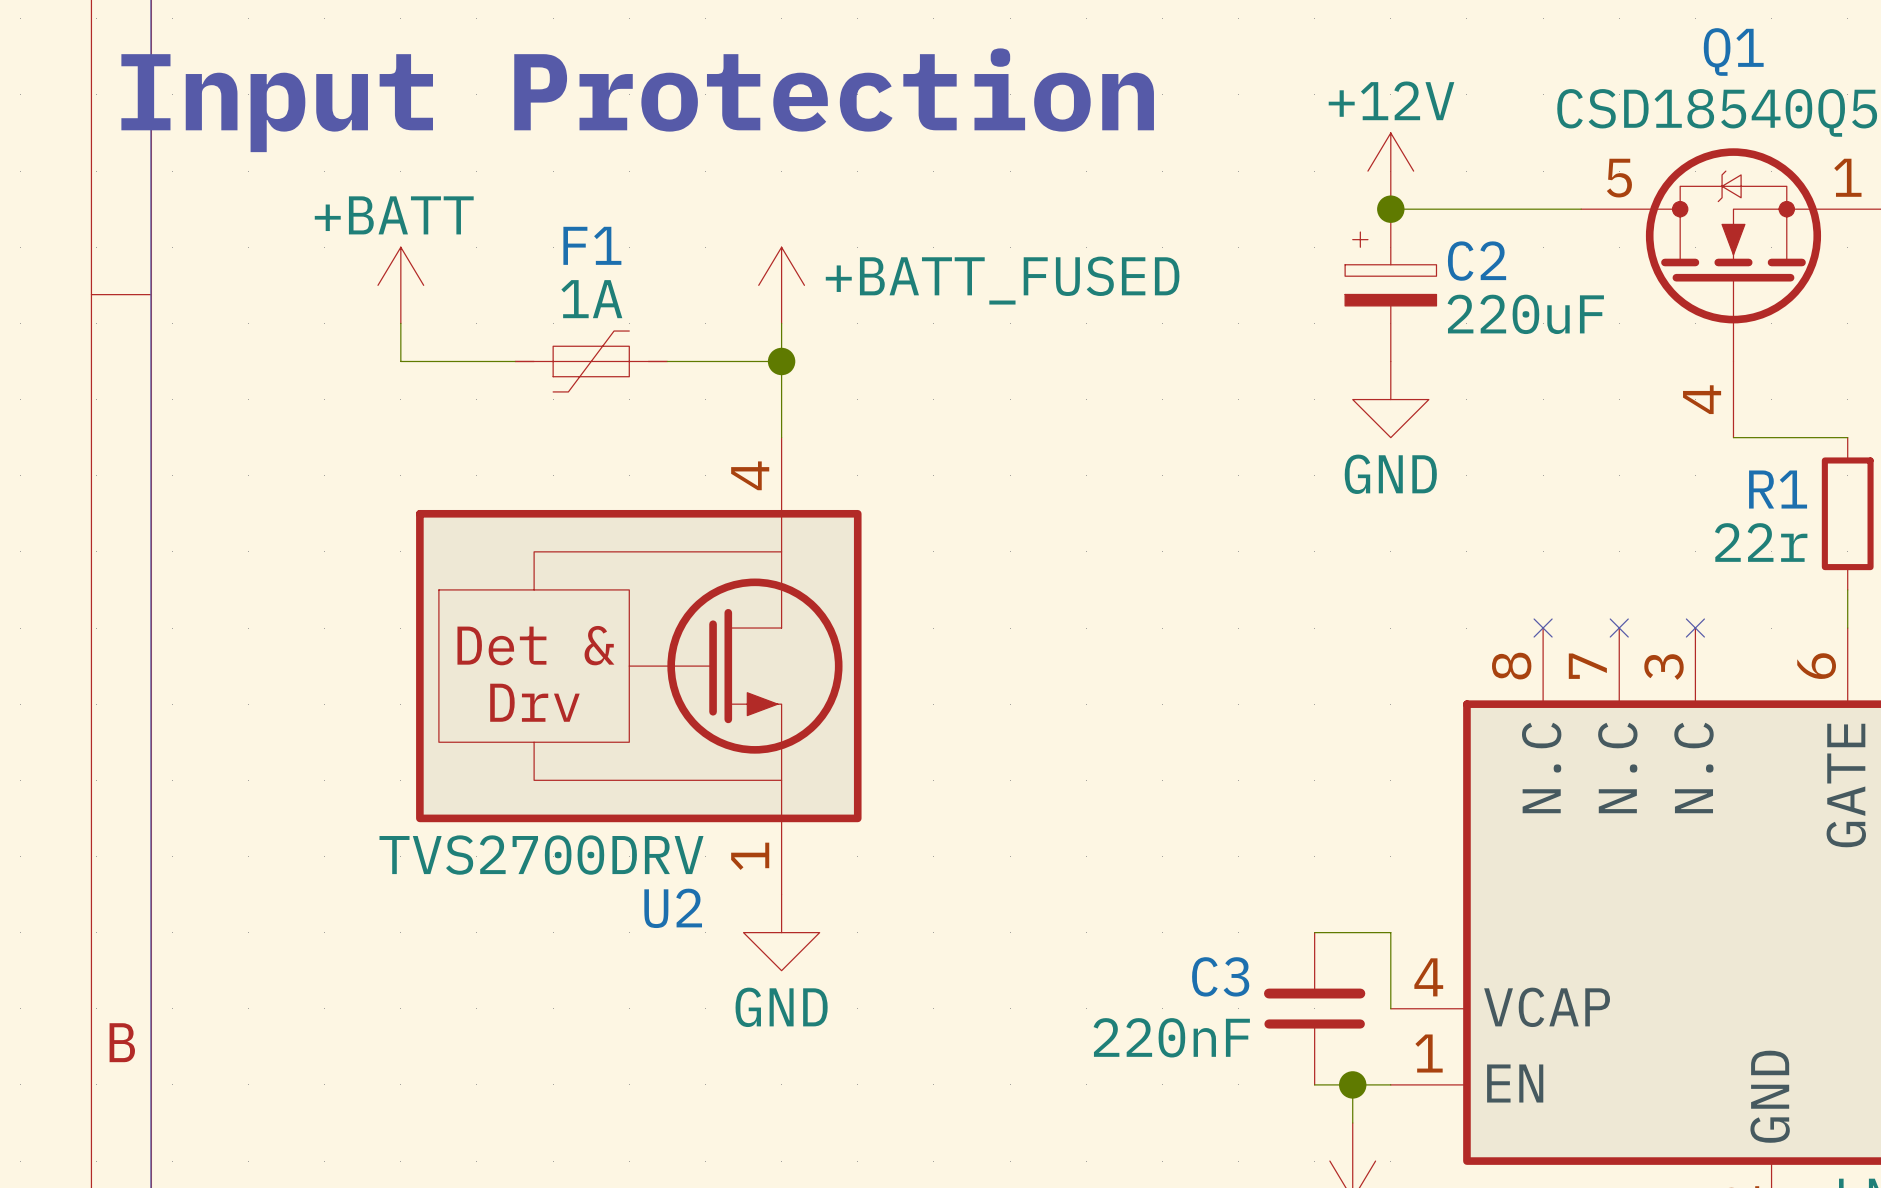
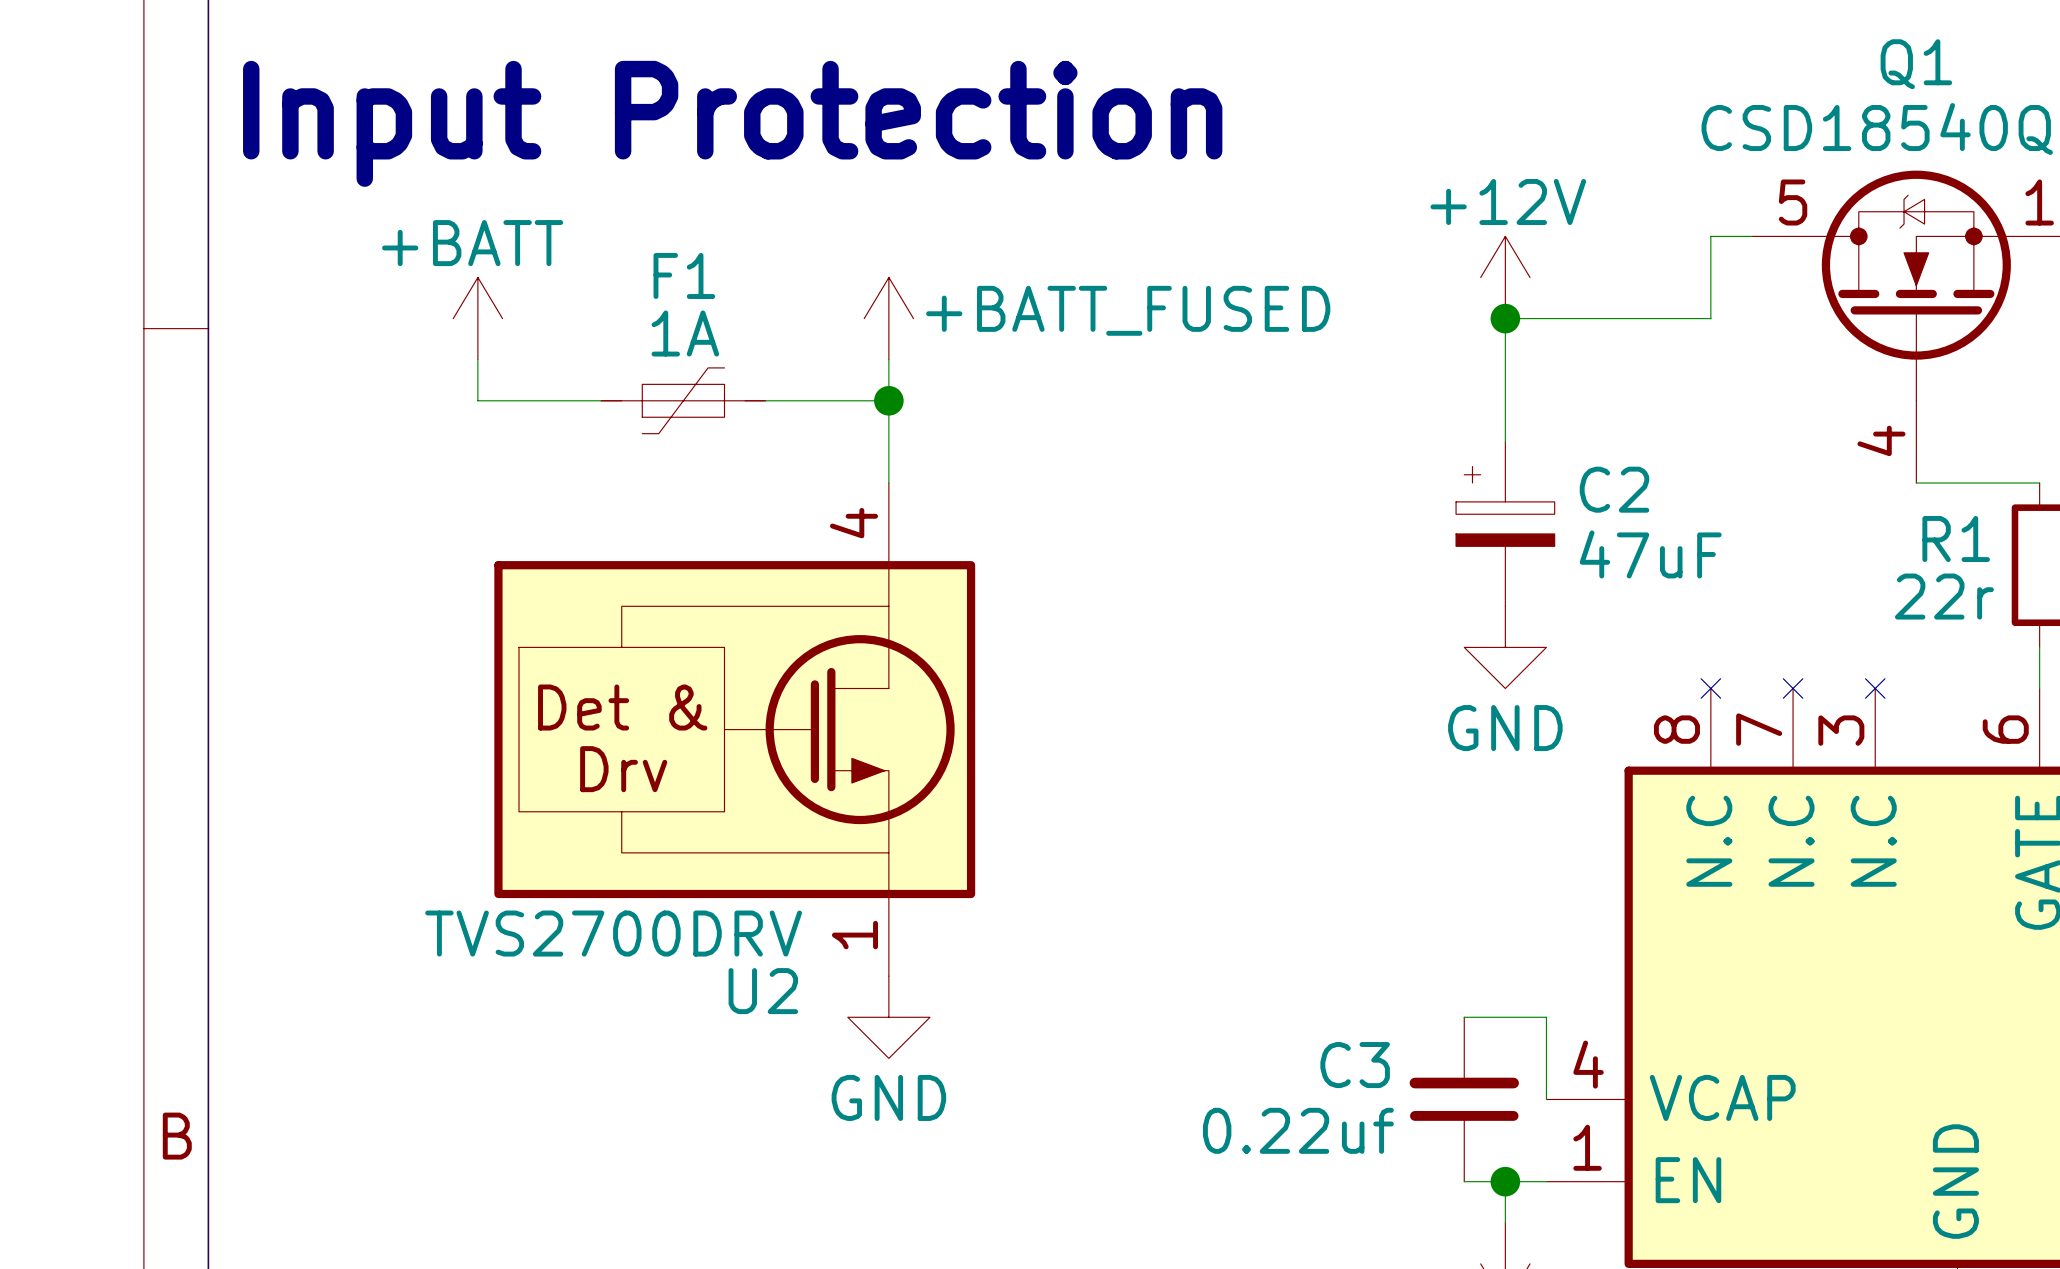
power symbol position: +12V (1390, 171) -> +12V (1505, 277)
wire: (1390, 209) (1543, 209) -> (1505, 441) (1505, 318) (1710, 318) (1710, 236)
junction position: (1390, 209) -> (1505, 318)
C2 name position: C2 (1477, 261) -> C2 (1614, 489)
C2 position: (1390, 285) -> (1505, 524)
C2 value: 220uF (1525, 314) -> 47uF (1650, 554)
power symbol position: GND (1390, 399) -> GND (1505, 647)
C3 value: 220nF (1171, 1037) -> 0.22uf (1298, 1130)

